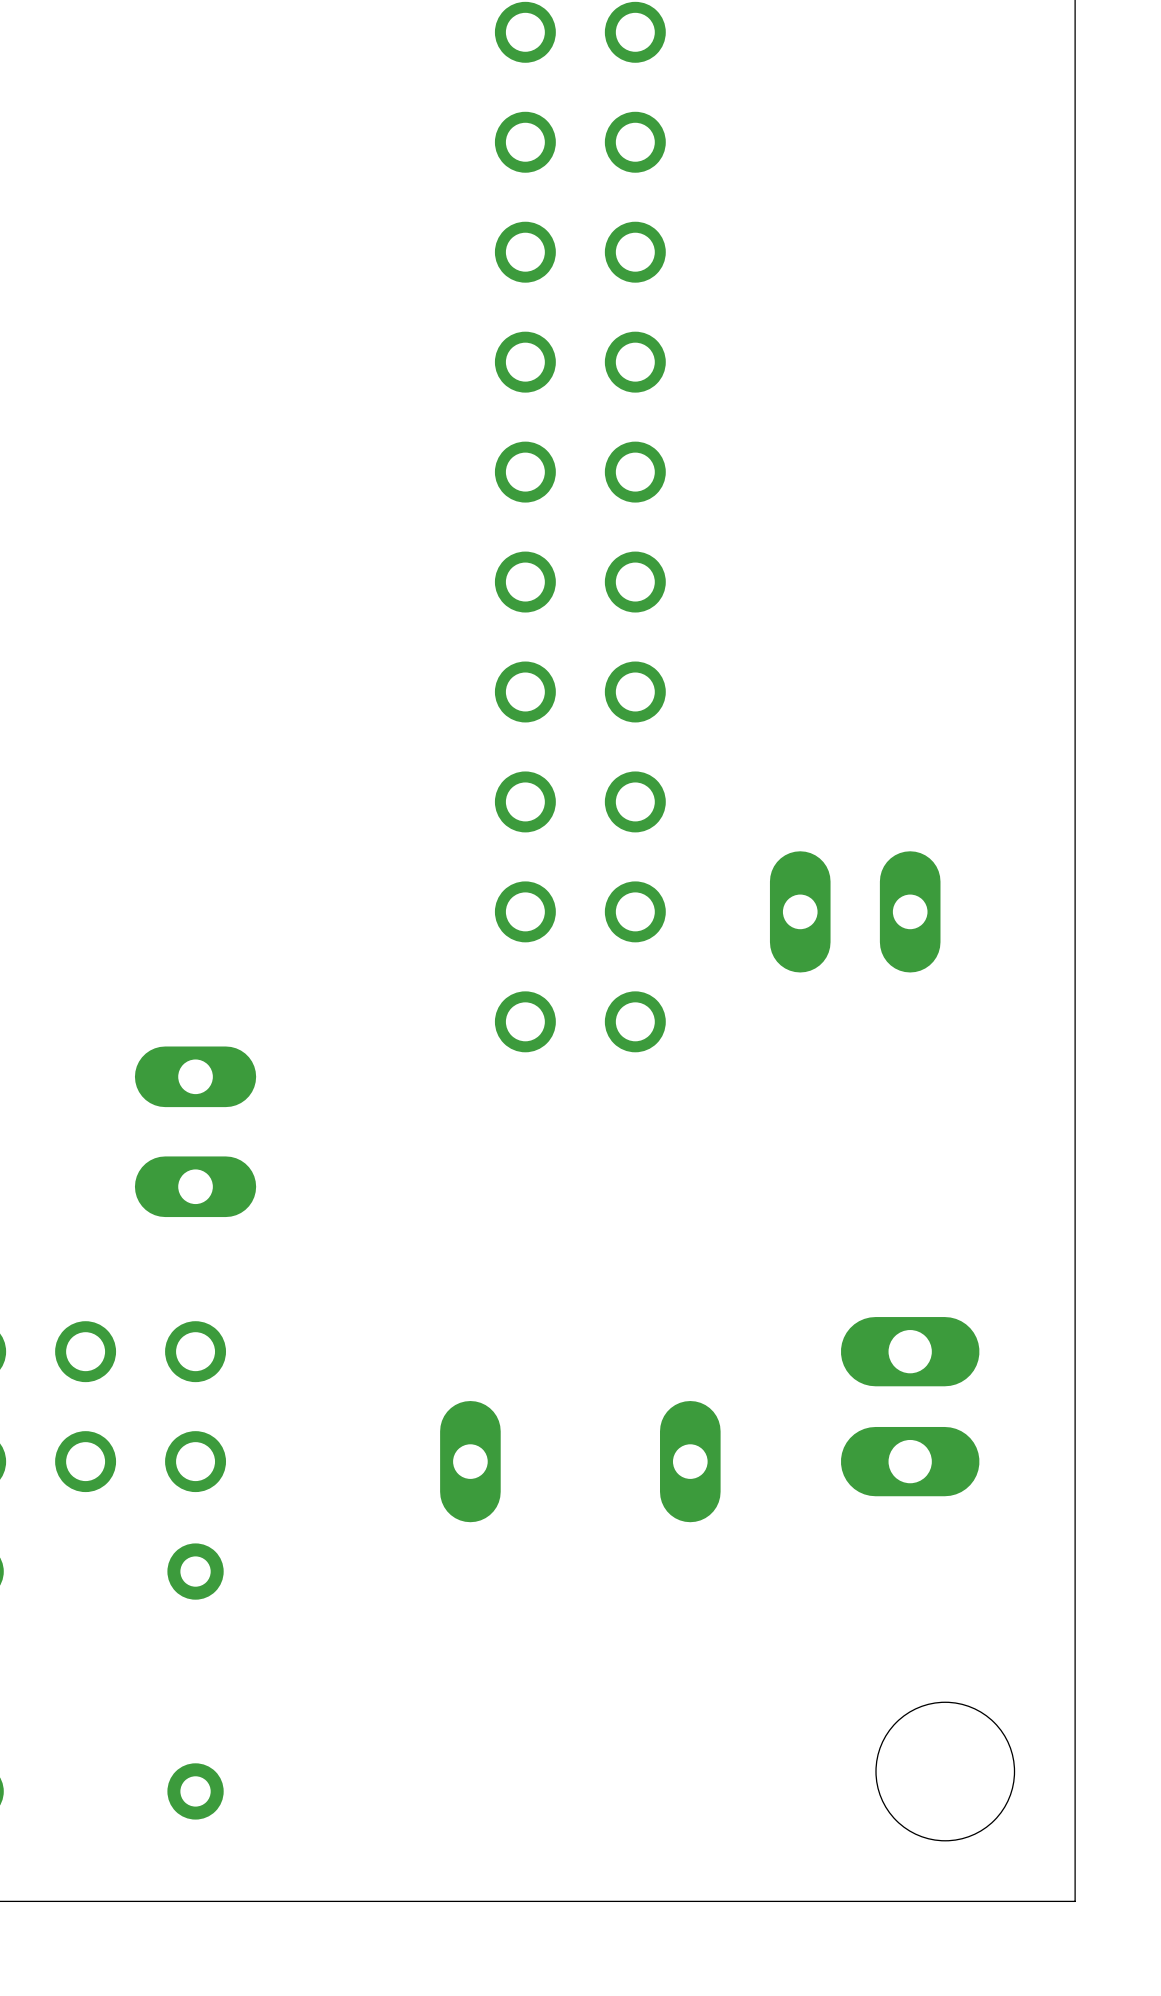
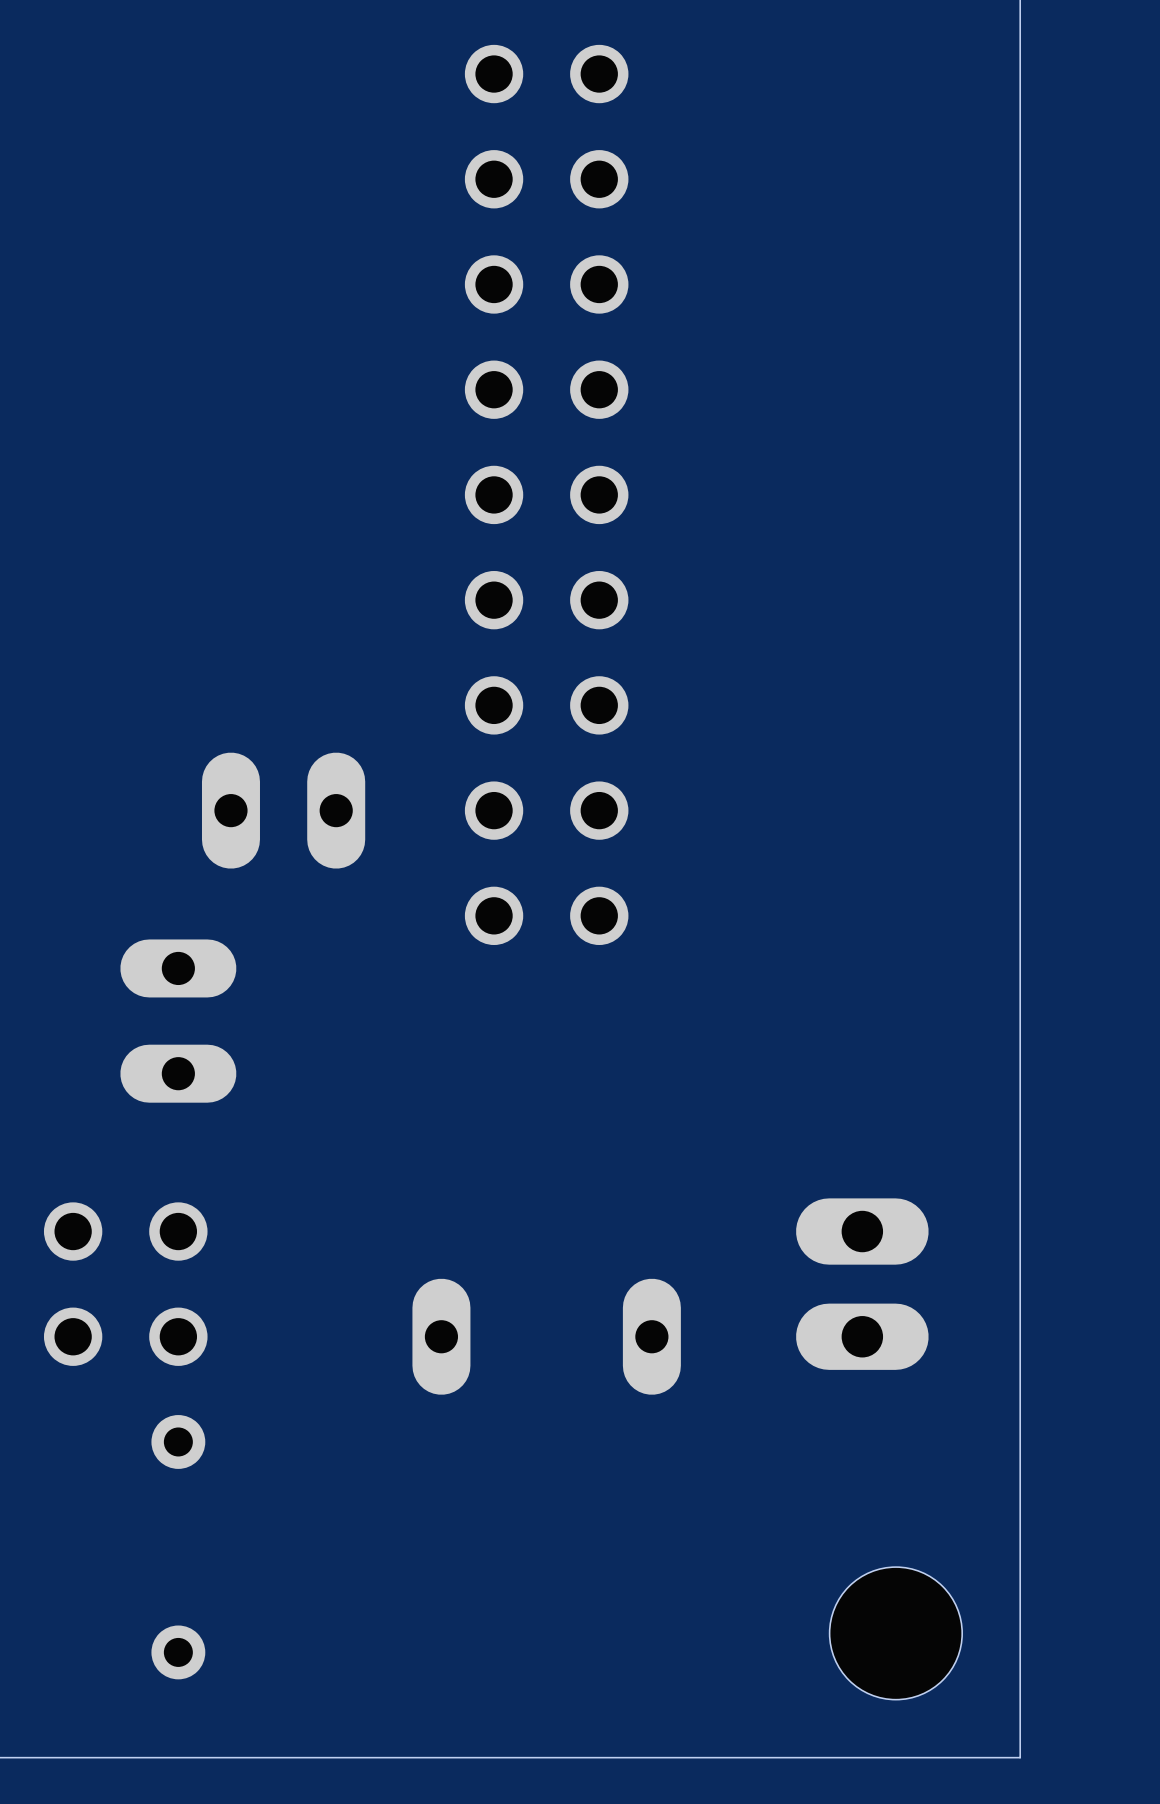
part position: (855, 911) -> (283, 810)

